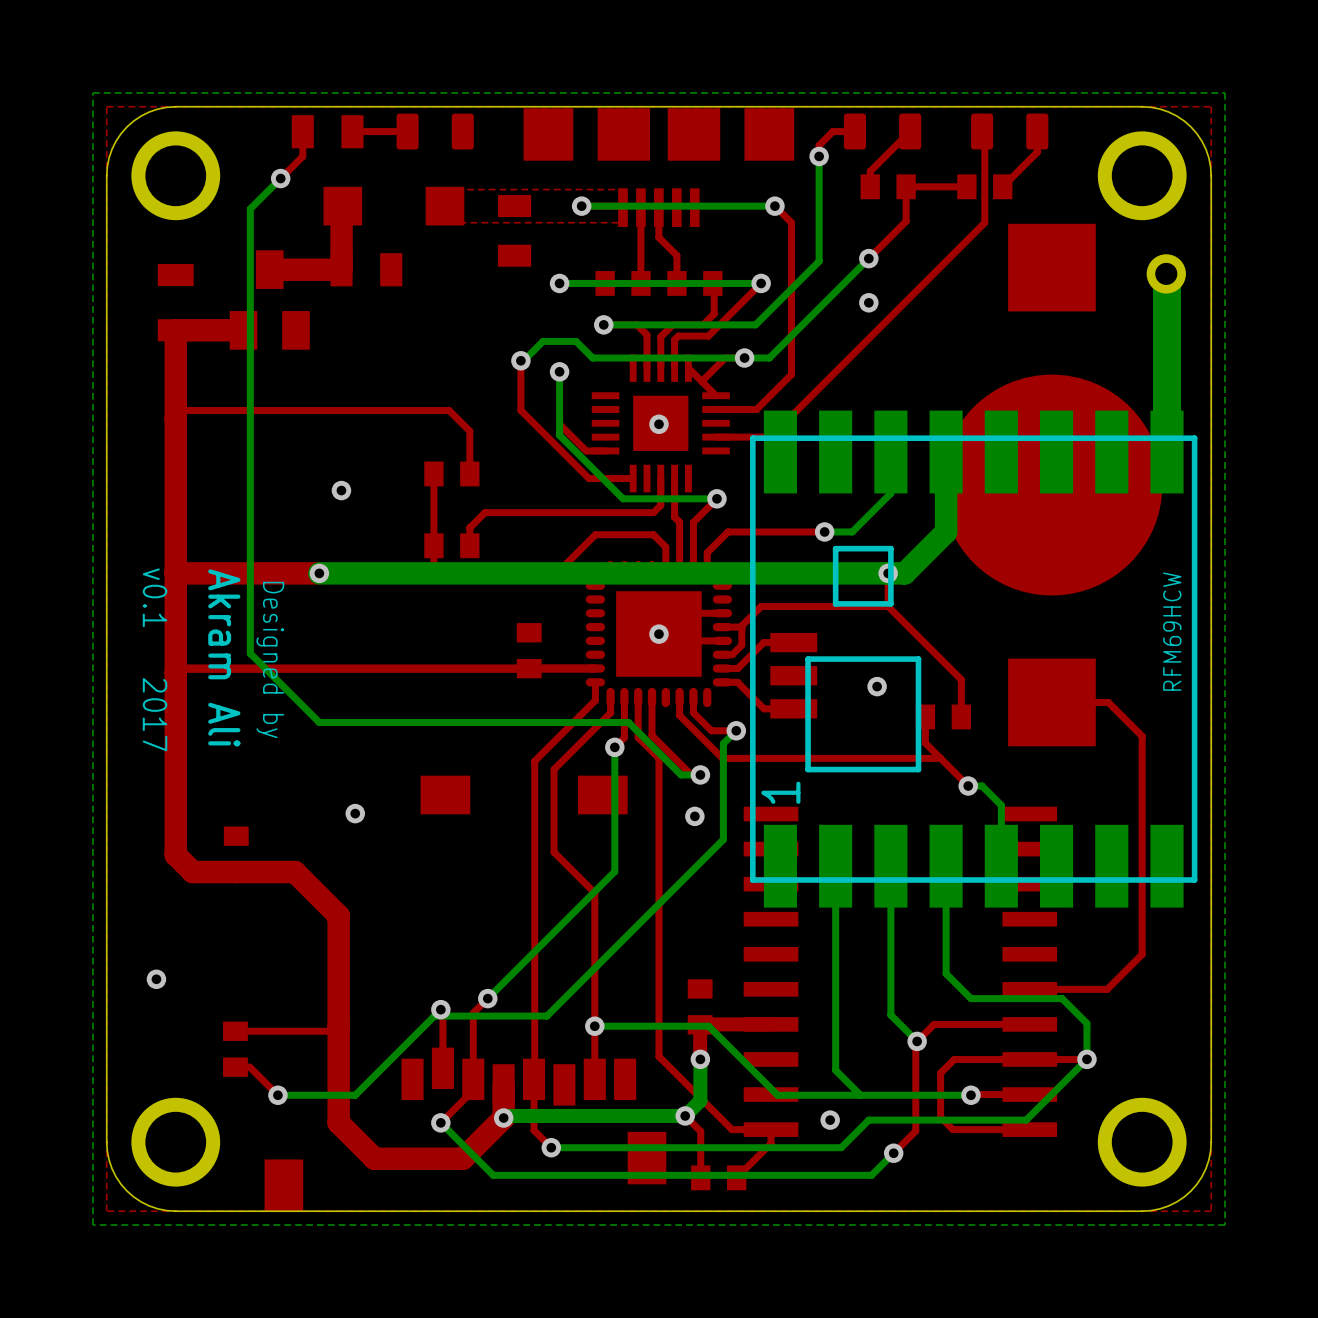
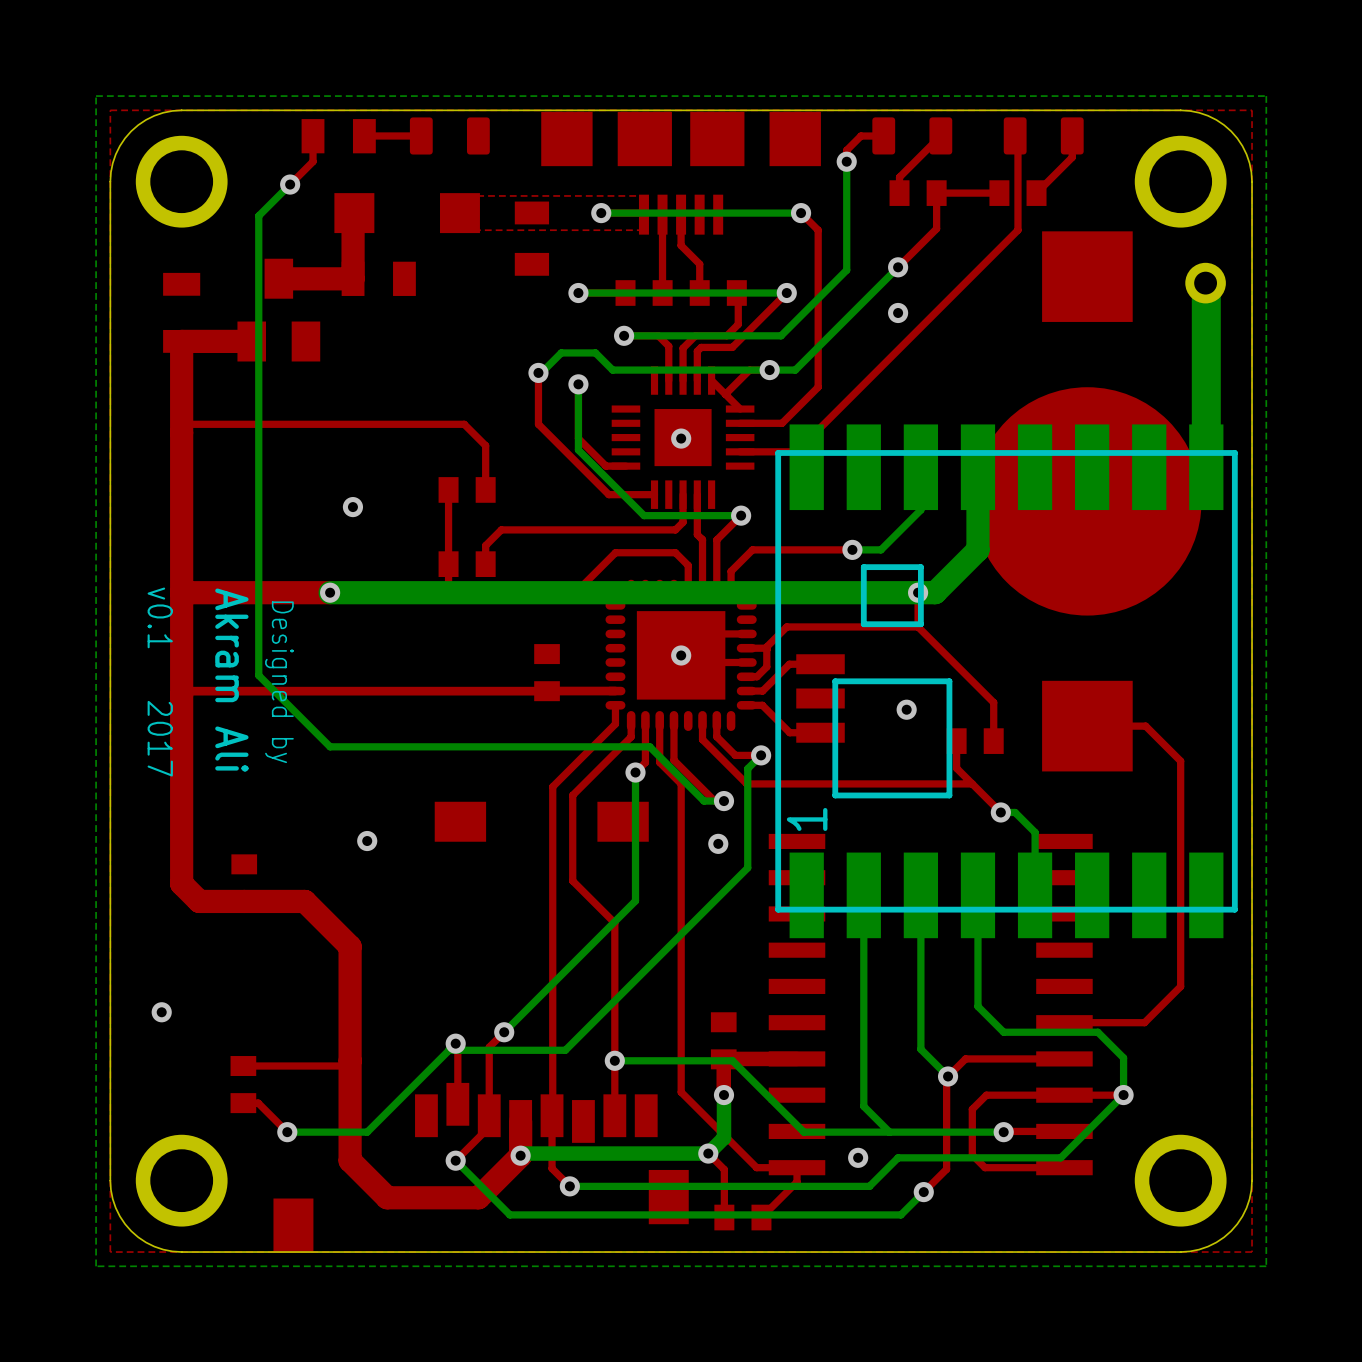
part value: RFM69HCW (1172, 631) -> none

